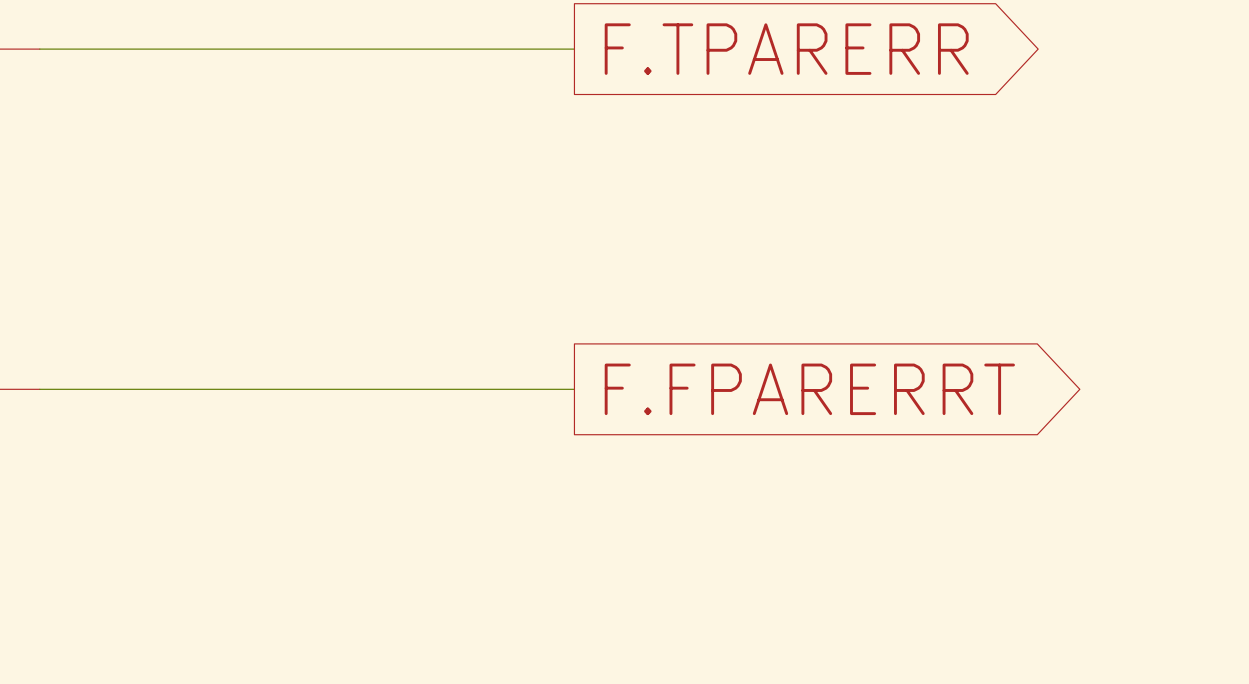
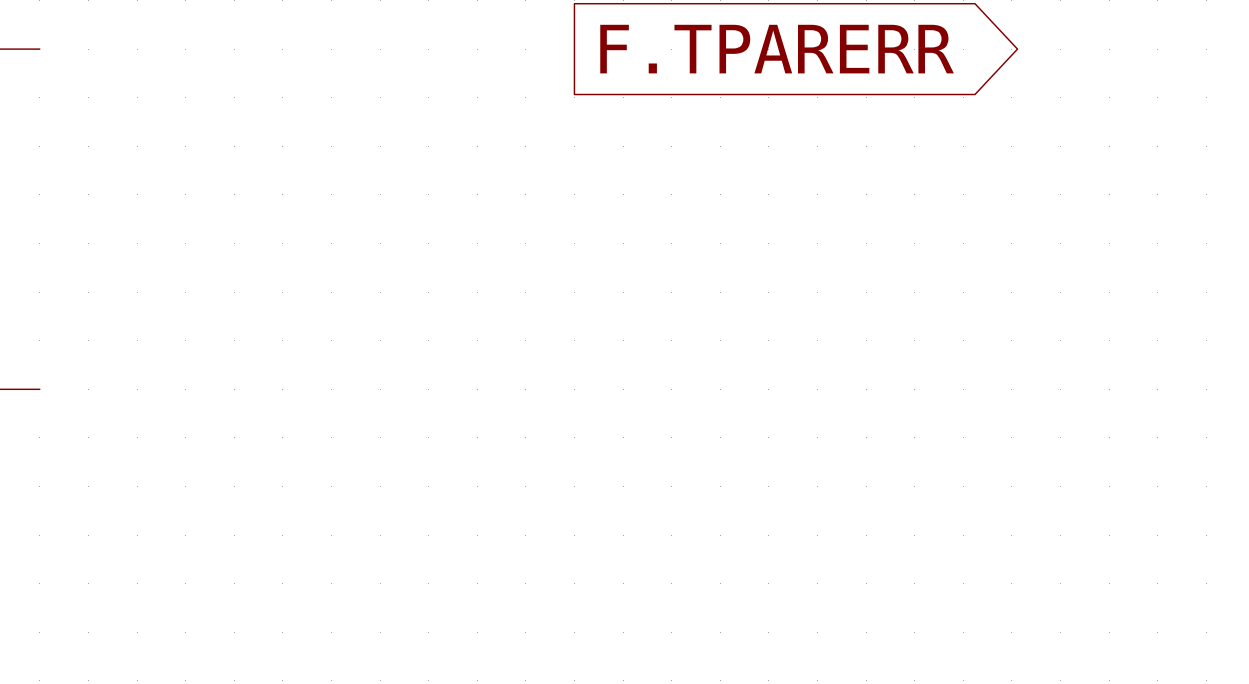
wire: (39, 49) (574, 49) -> none
wire: (39, 389) (574, 389) -> none
global label: F.FPARERRT (809, 389) -> none

